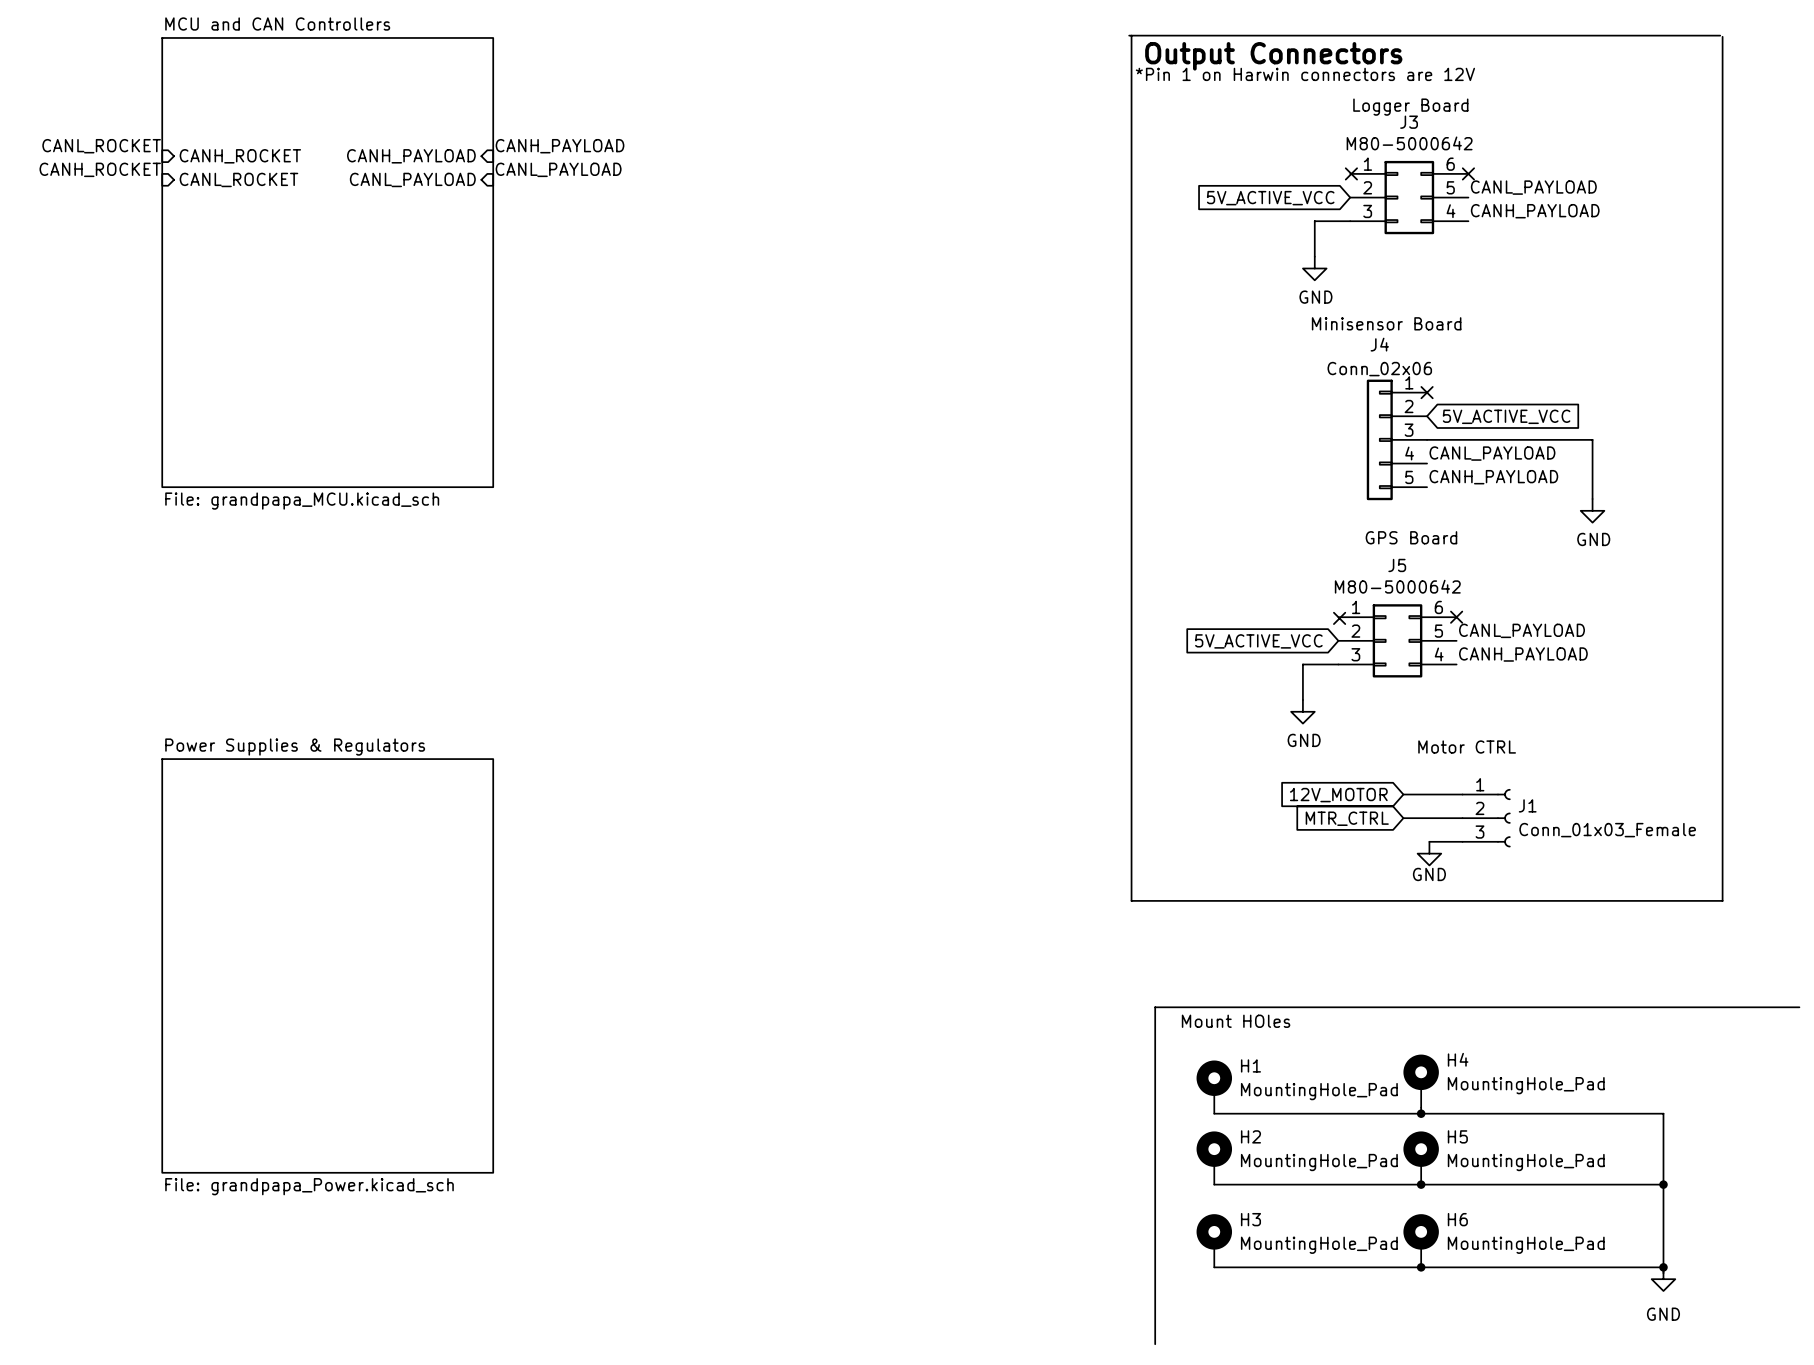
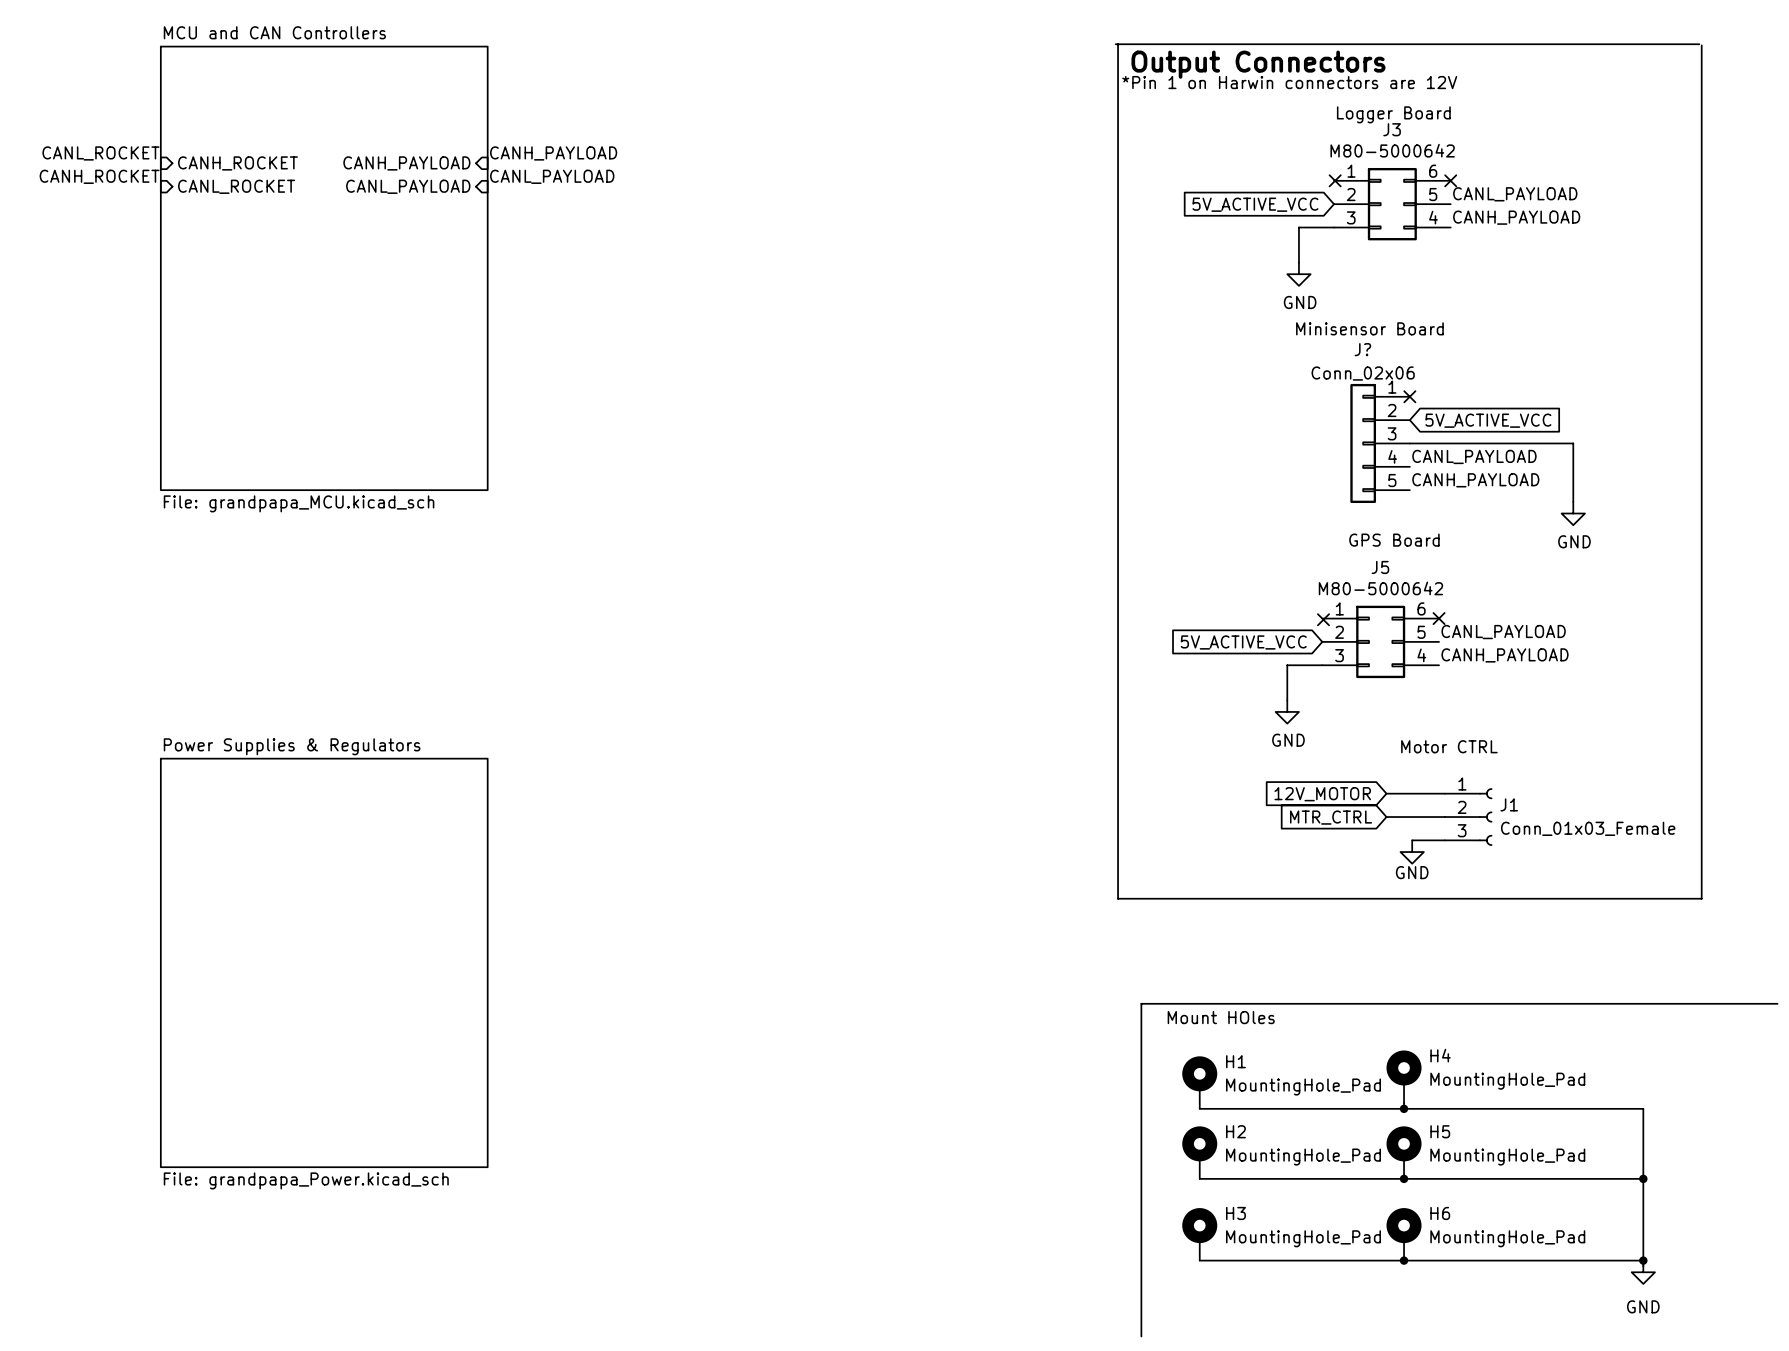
J4 name: J4 (1379, 344) -> J? (1362, 349)

